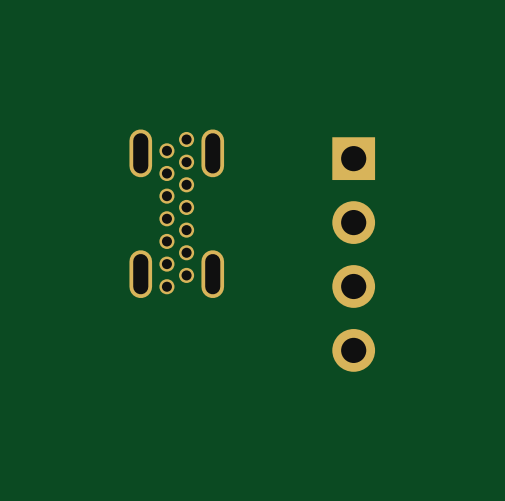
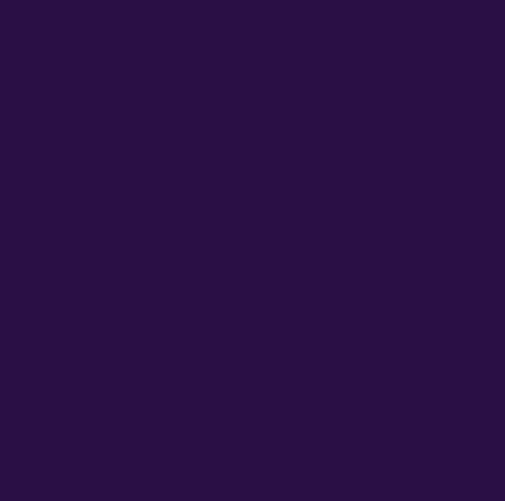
part: (176, 213) -> none
part: (353, 254) -> none

